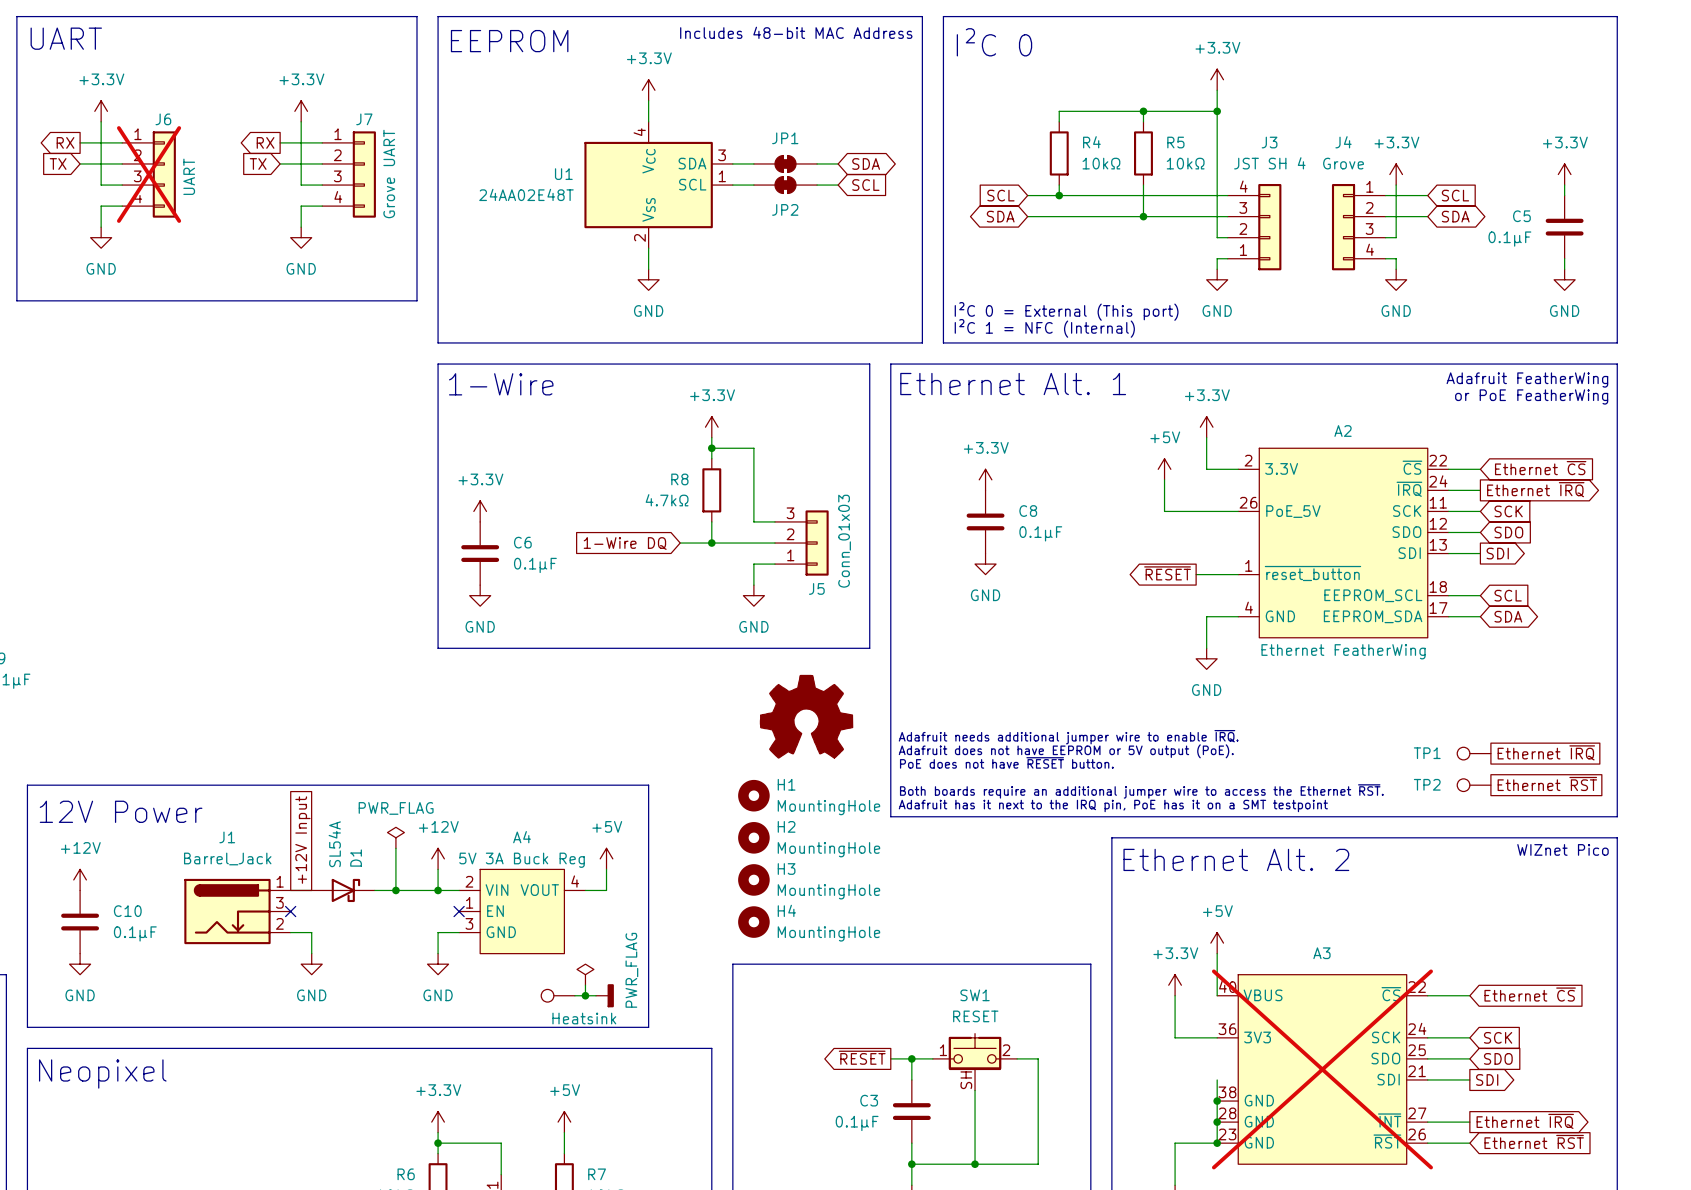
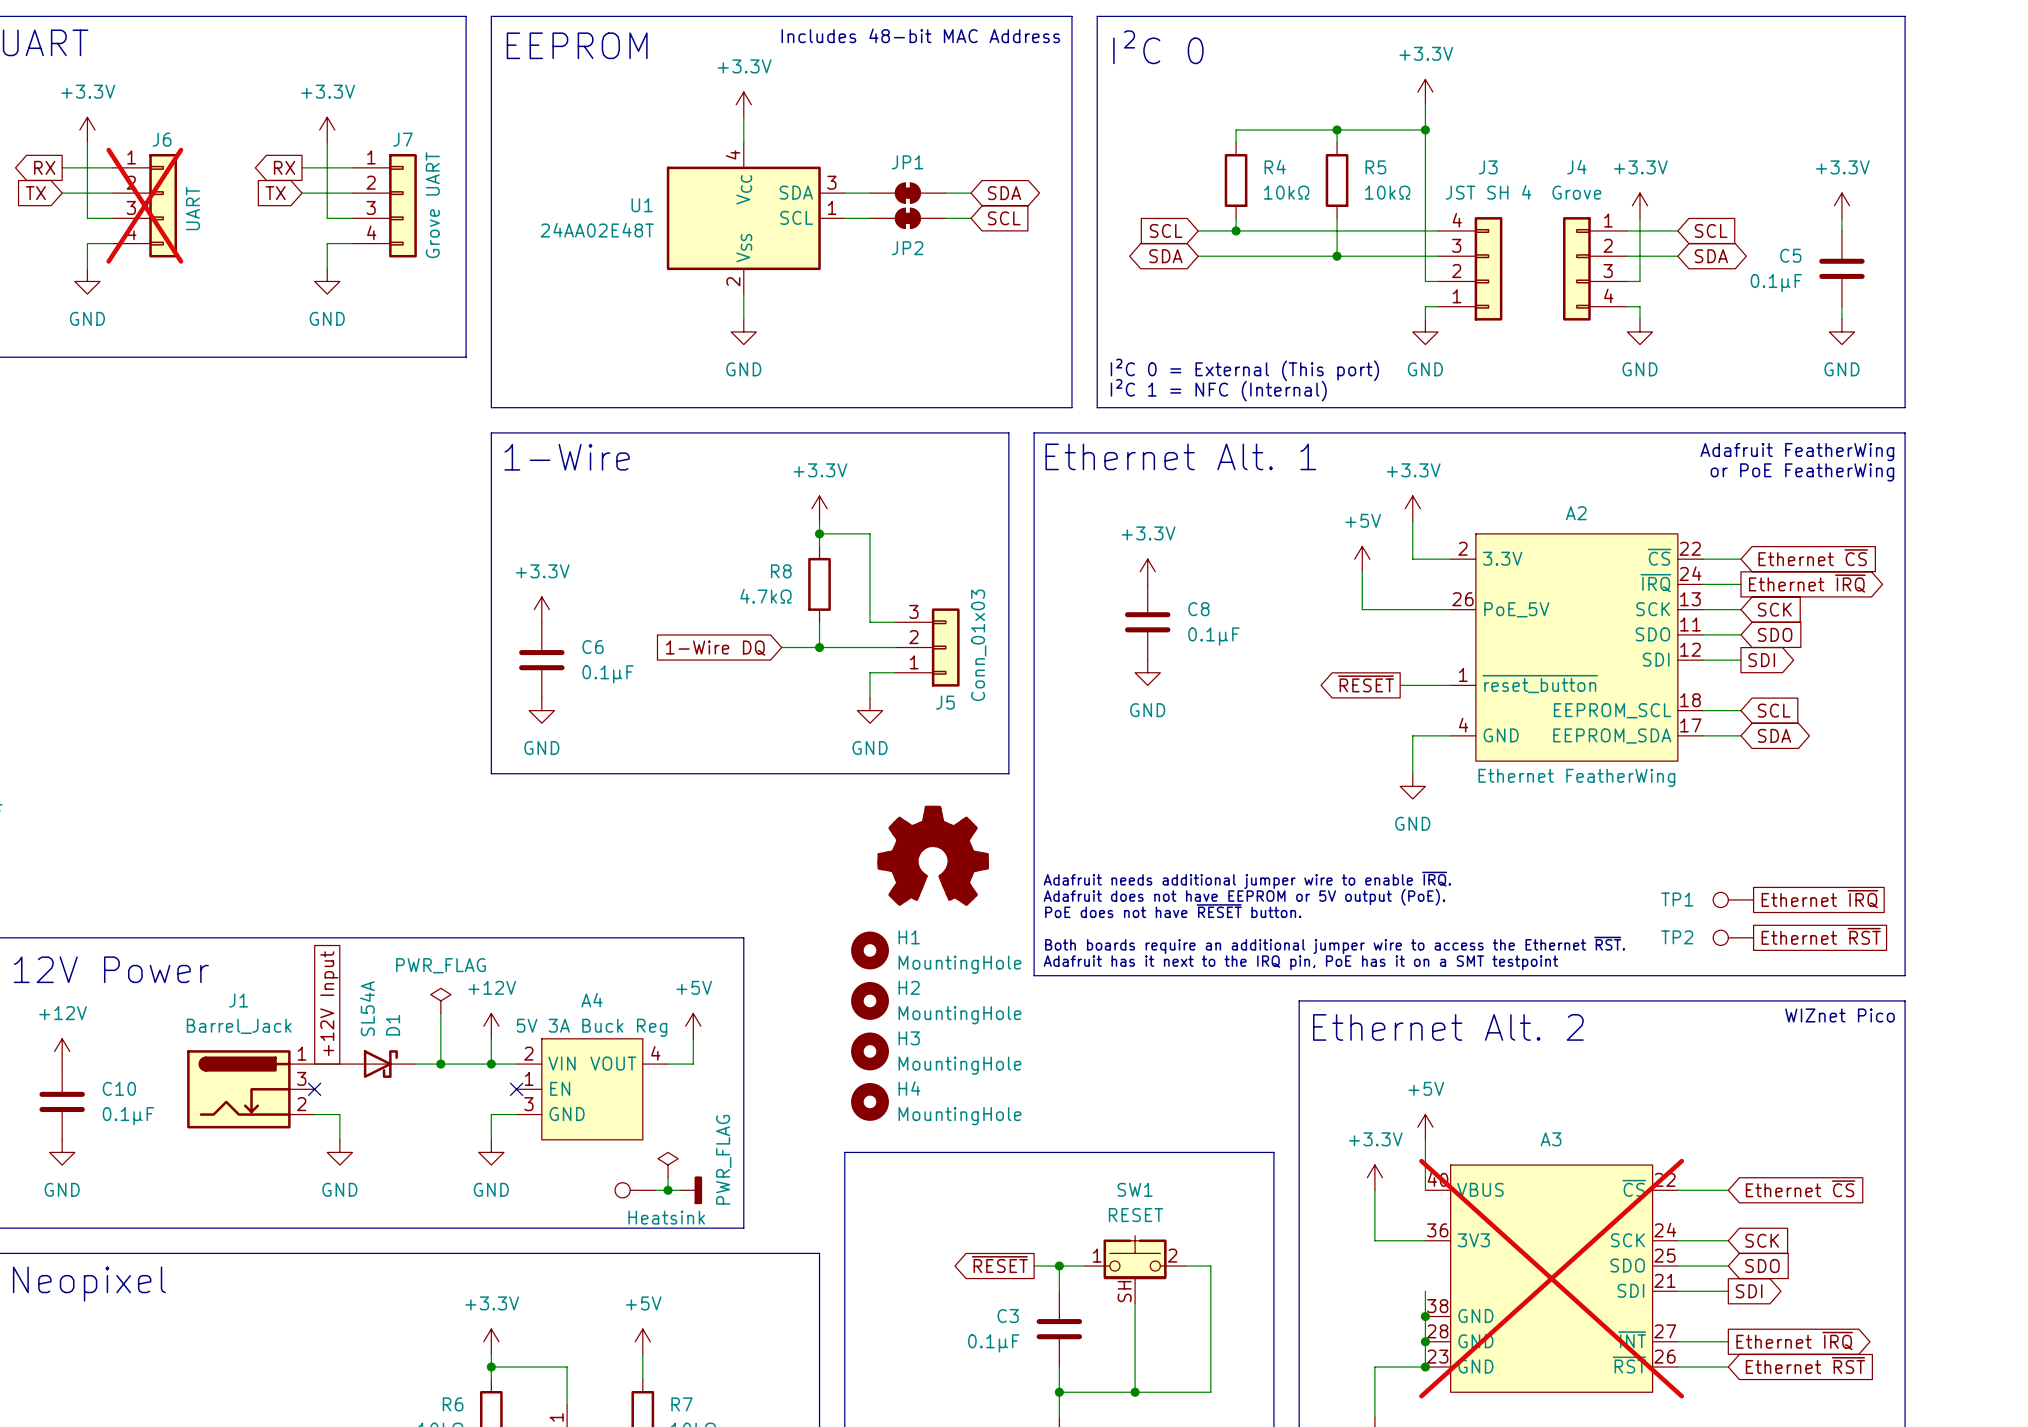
A2 pin number: 11 (1438, 502) -> 13 (1690, 599)
A2 pin number: 12 (1438, 523) -> 11 (1690, 624)
A2 pin number: 13 (1438, 544) -> 12 (1690, 649)

